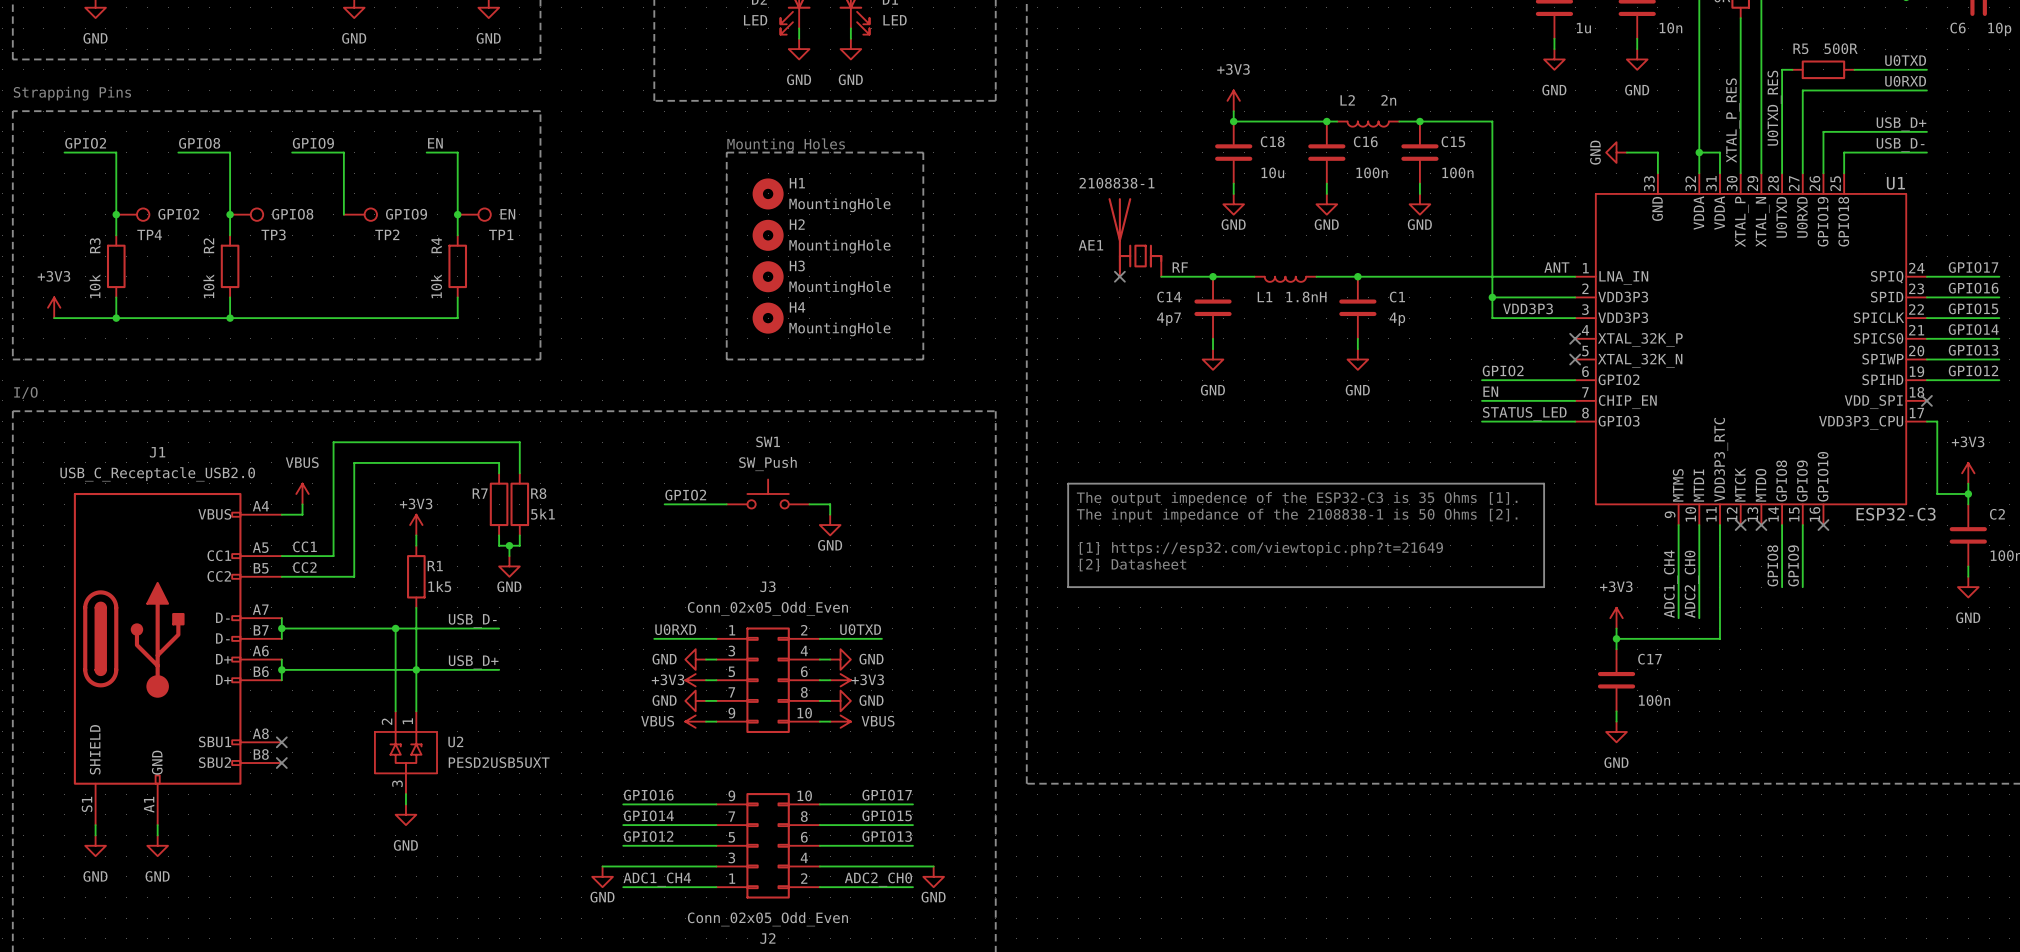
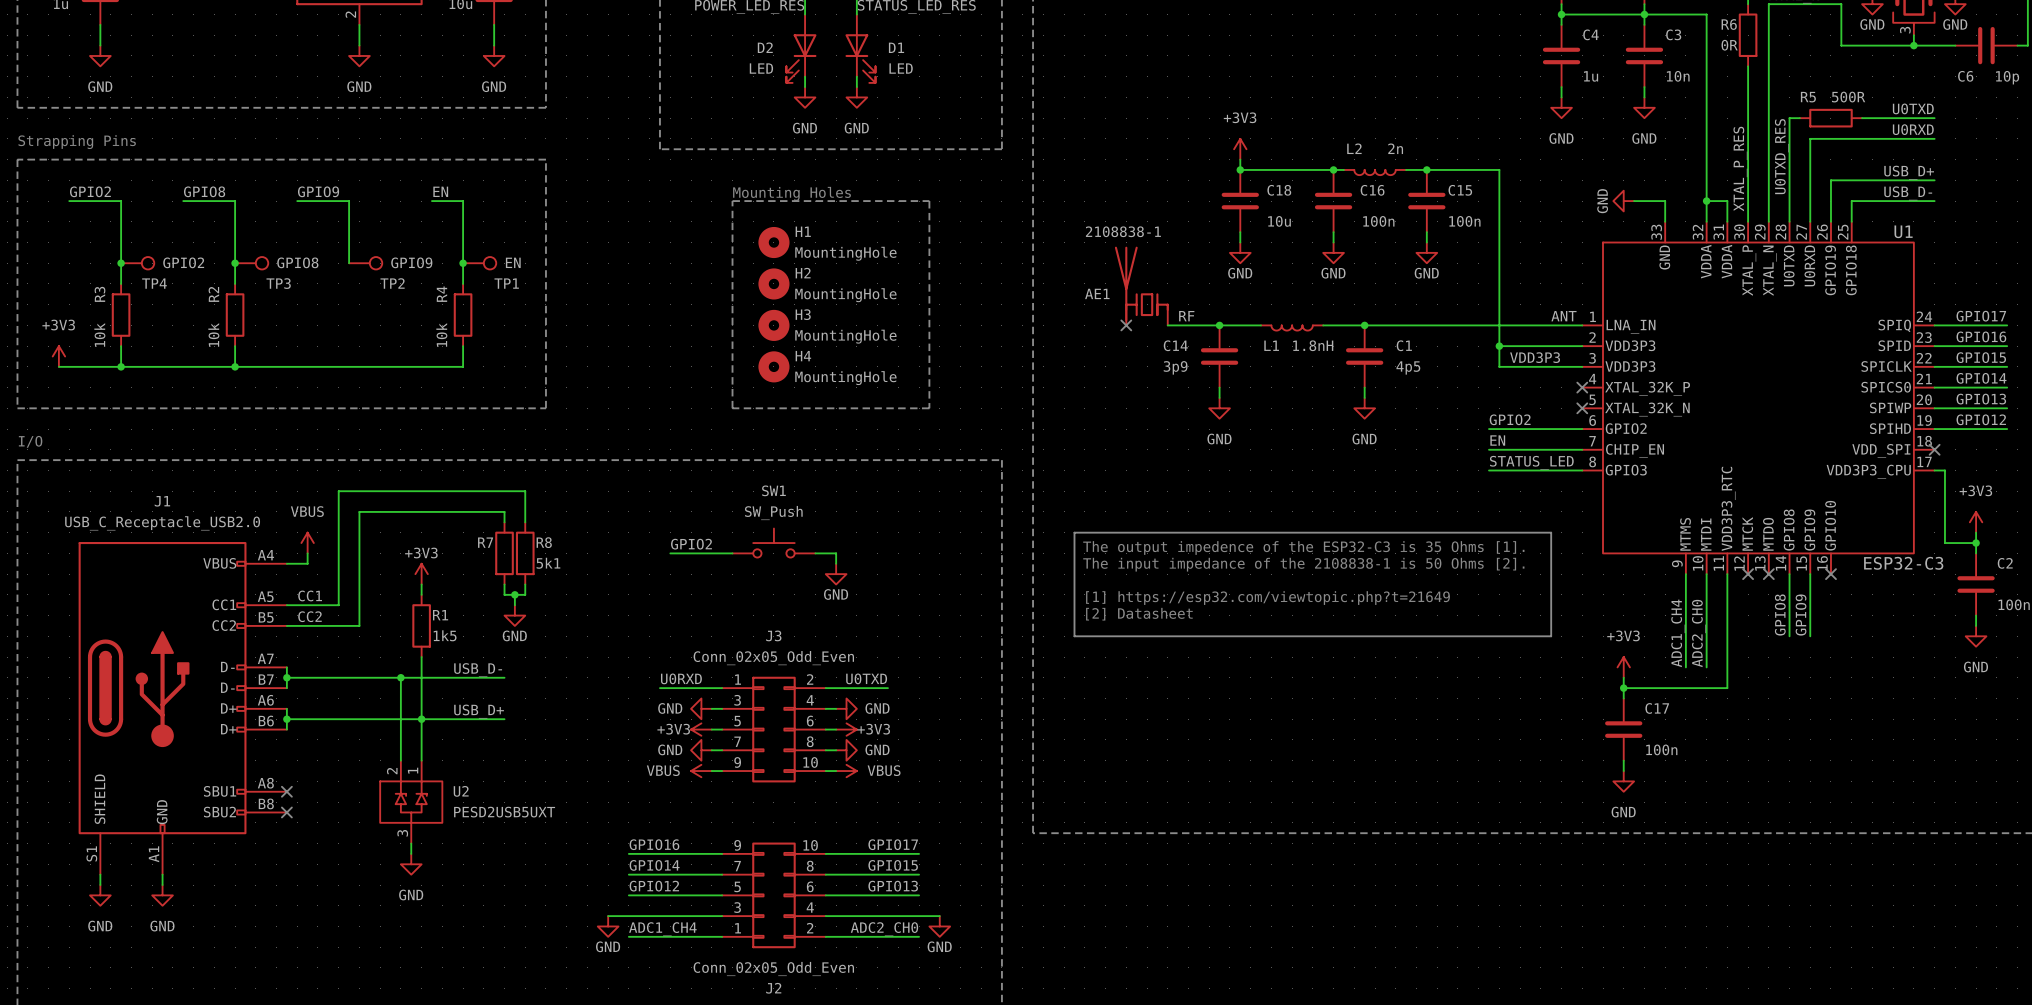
C14 value: 4p7 (1168, 319) -> 3p9 (1175, 367)
C1 value: 4p (1397, 319) -> 4p5 (1408, 367)

